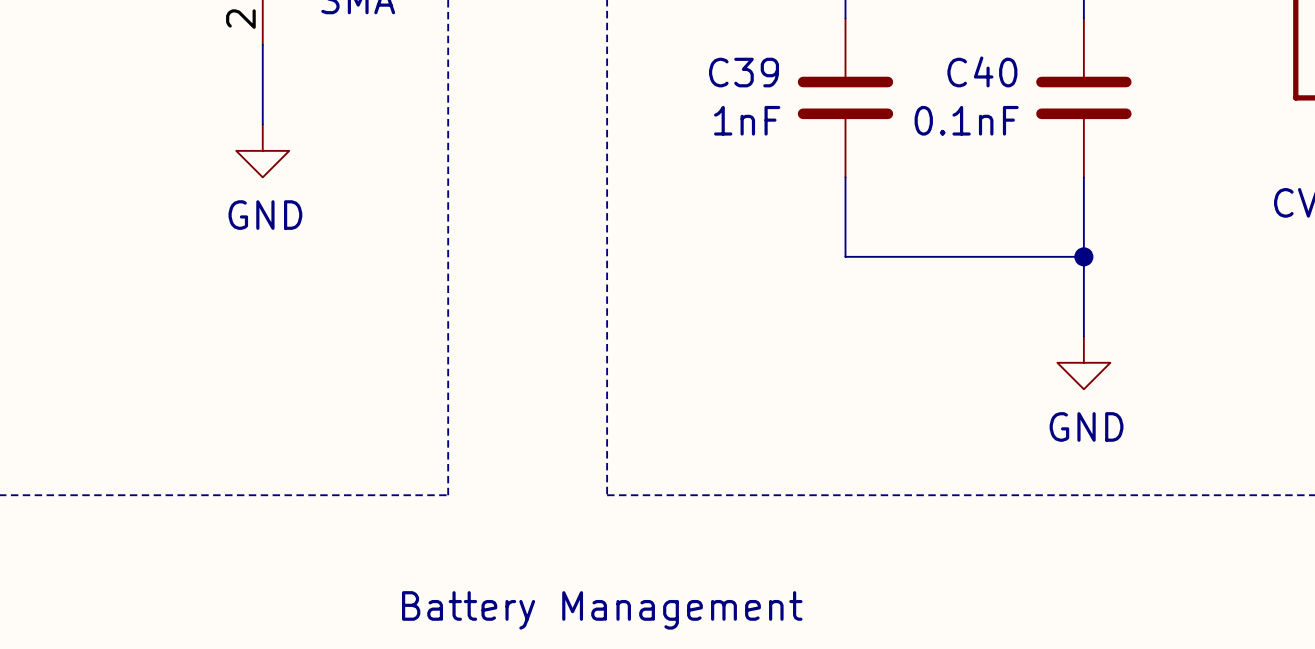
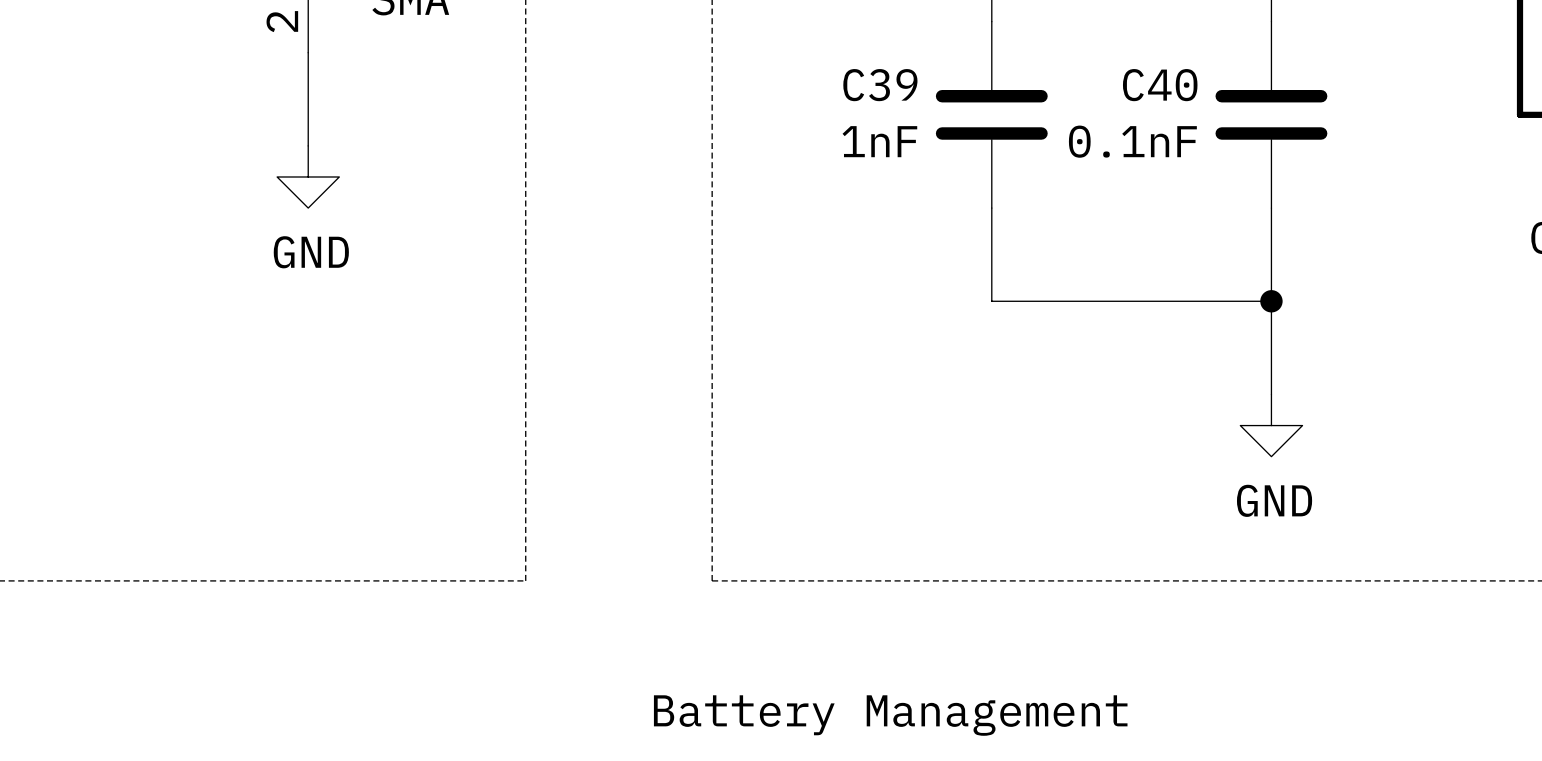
text position: Battery Management (602, 610) -> Battery Management (890, 715)

